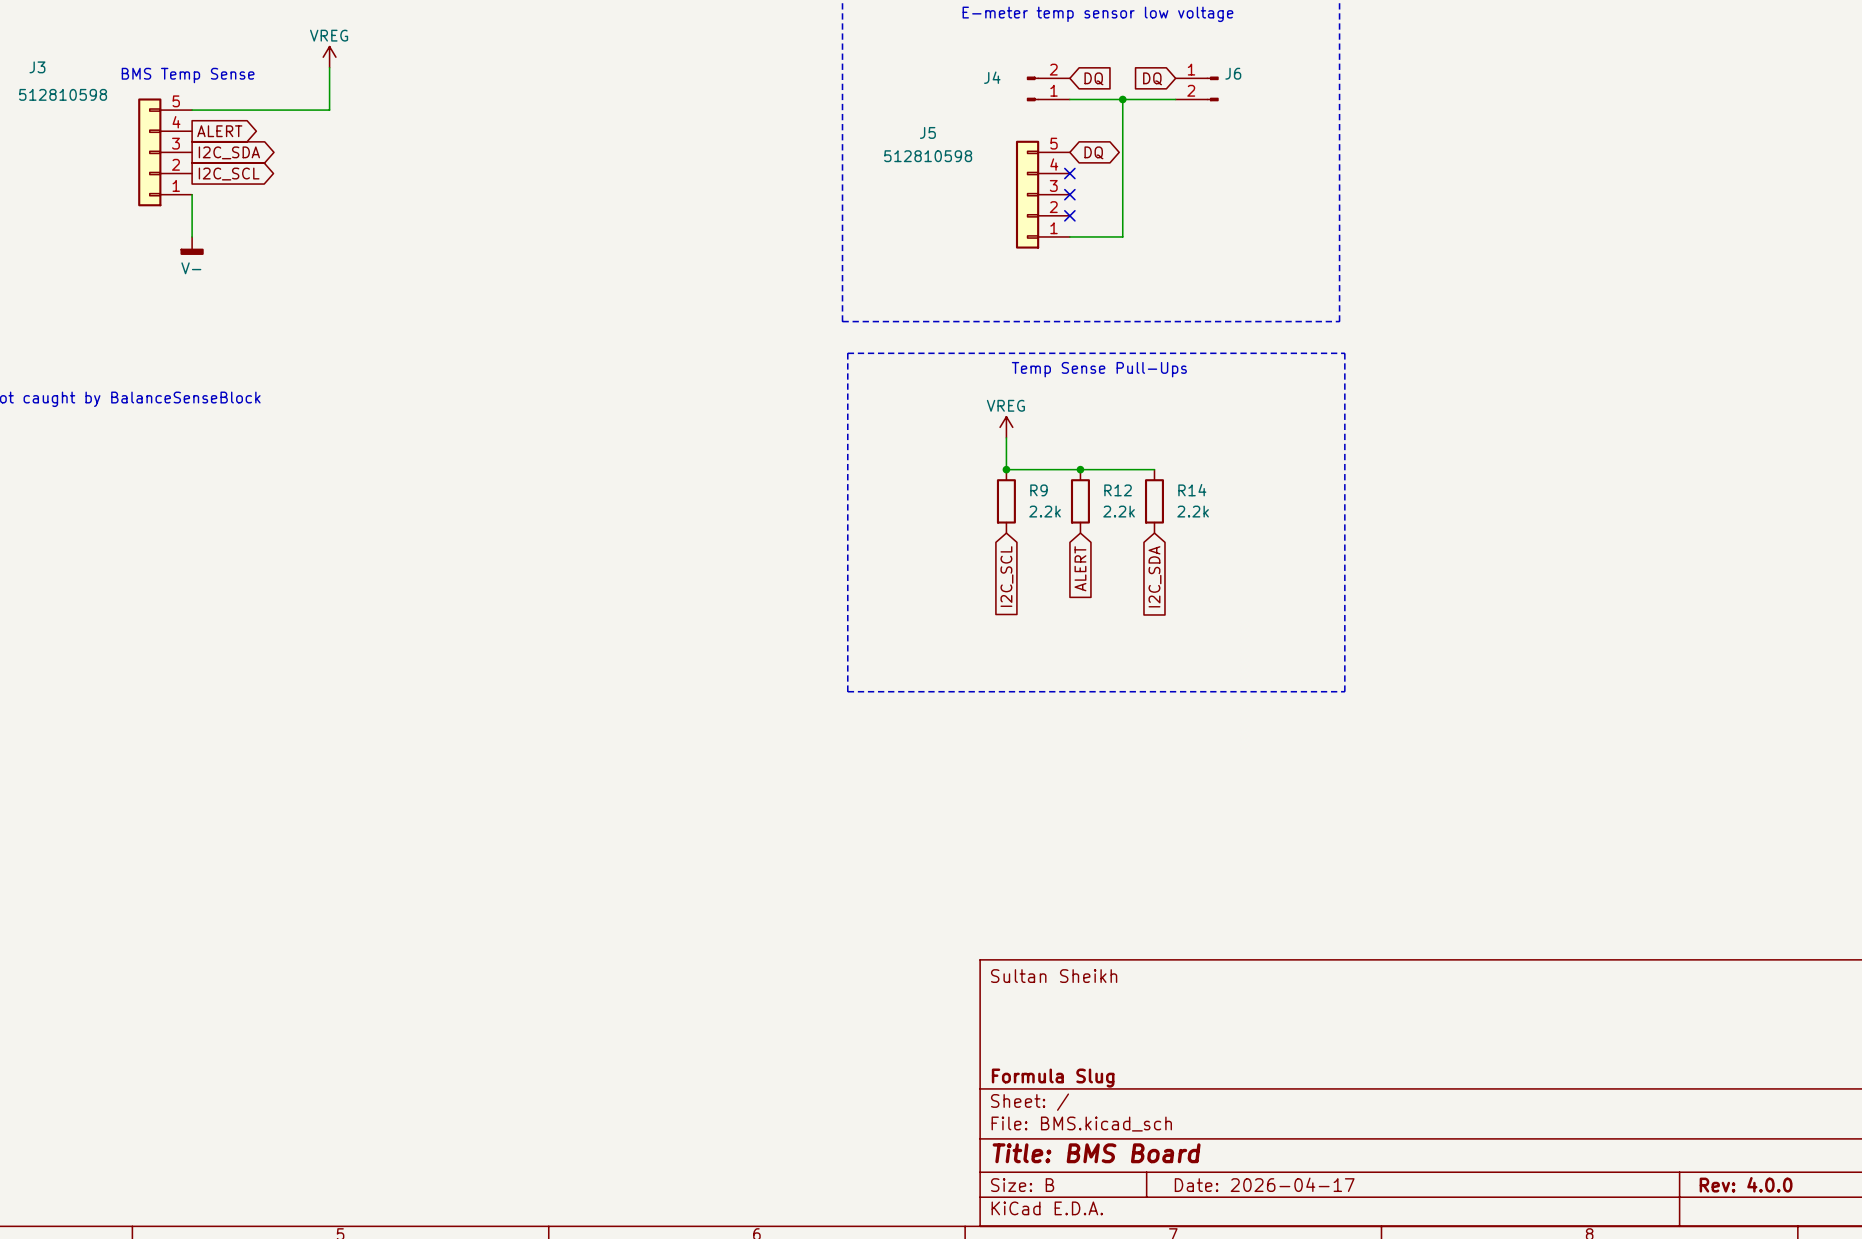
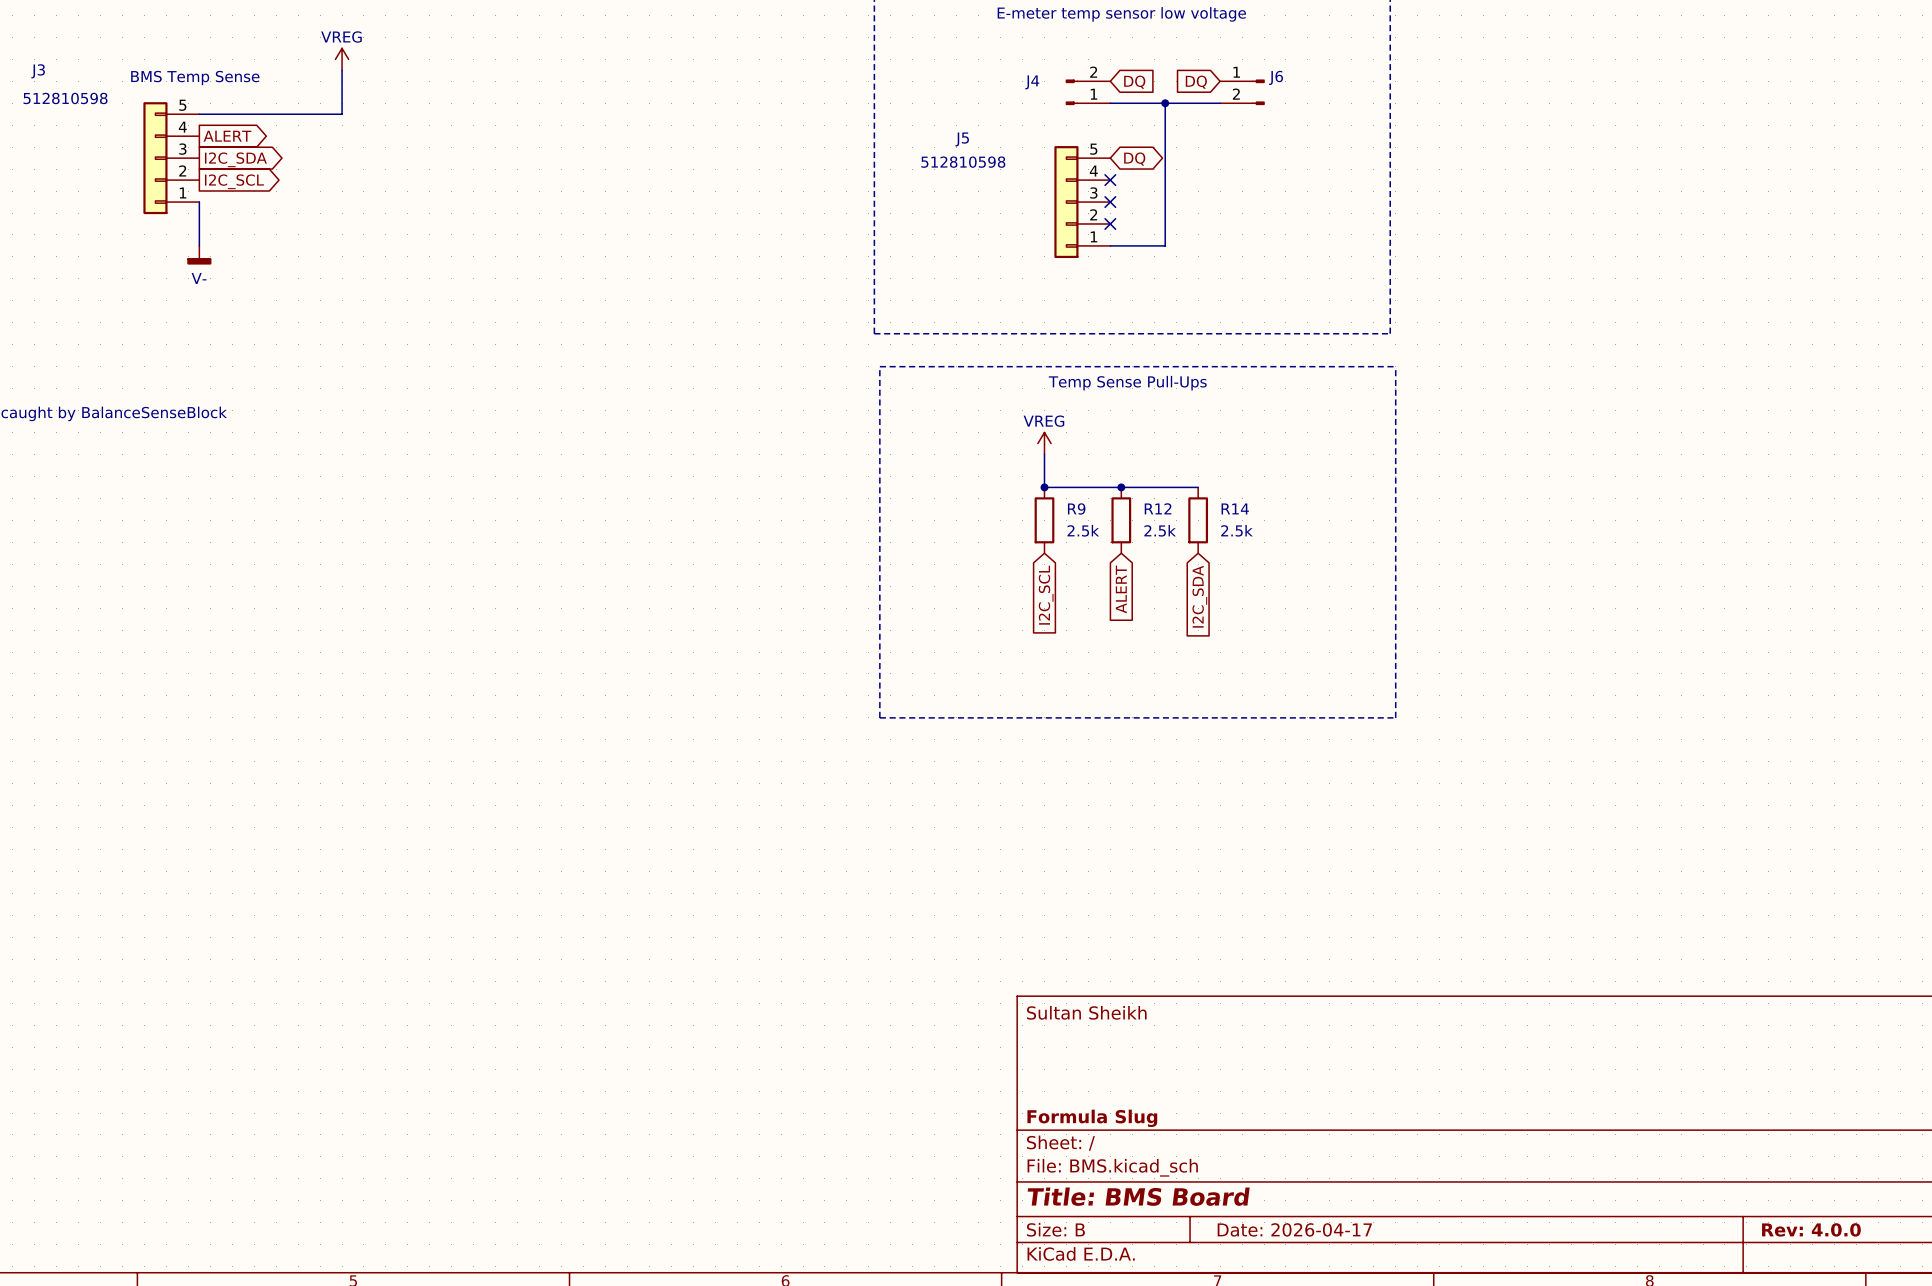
R9 value: 2.2k (1045, 511) -> 2.5k (1083, 530)
R12 value: 2.2k (1119, 511) -> 2.5k (1160, 530)
R14 value: 2.2k (1193, 511) -> 2.5k (1236, 530)

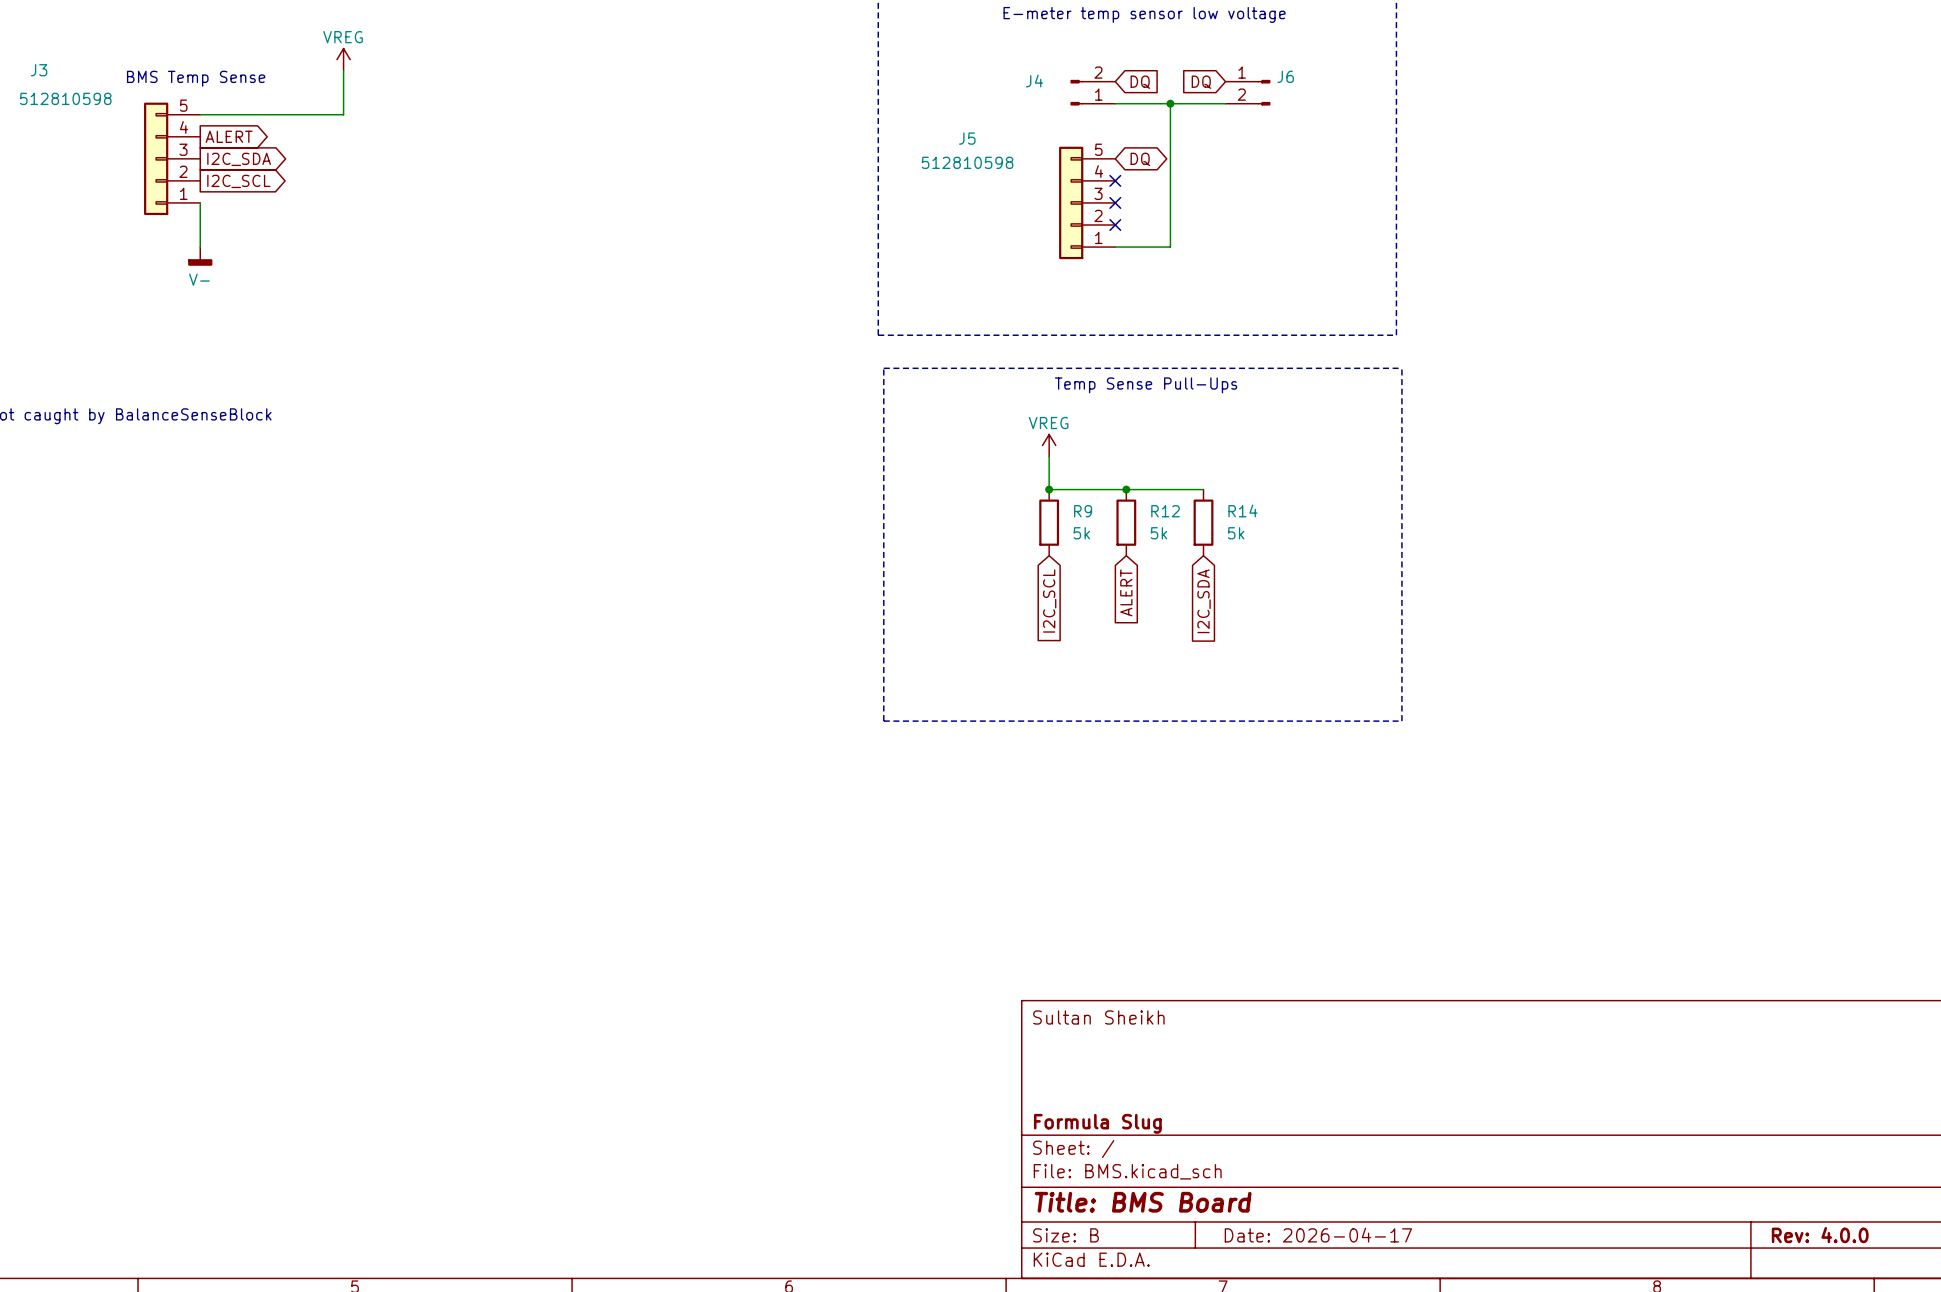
R9 value: 2.5k (1083, 530) -> 5k (1081, 533)
R12 value: 2.5k (1160, 530) -> 5k (1158, 533)
R14 value: 2.5k (1236, 530) -> 5k (1236, 533)

